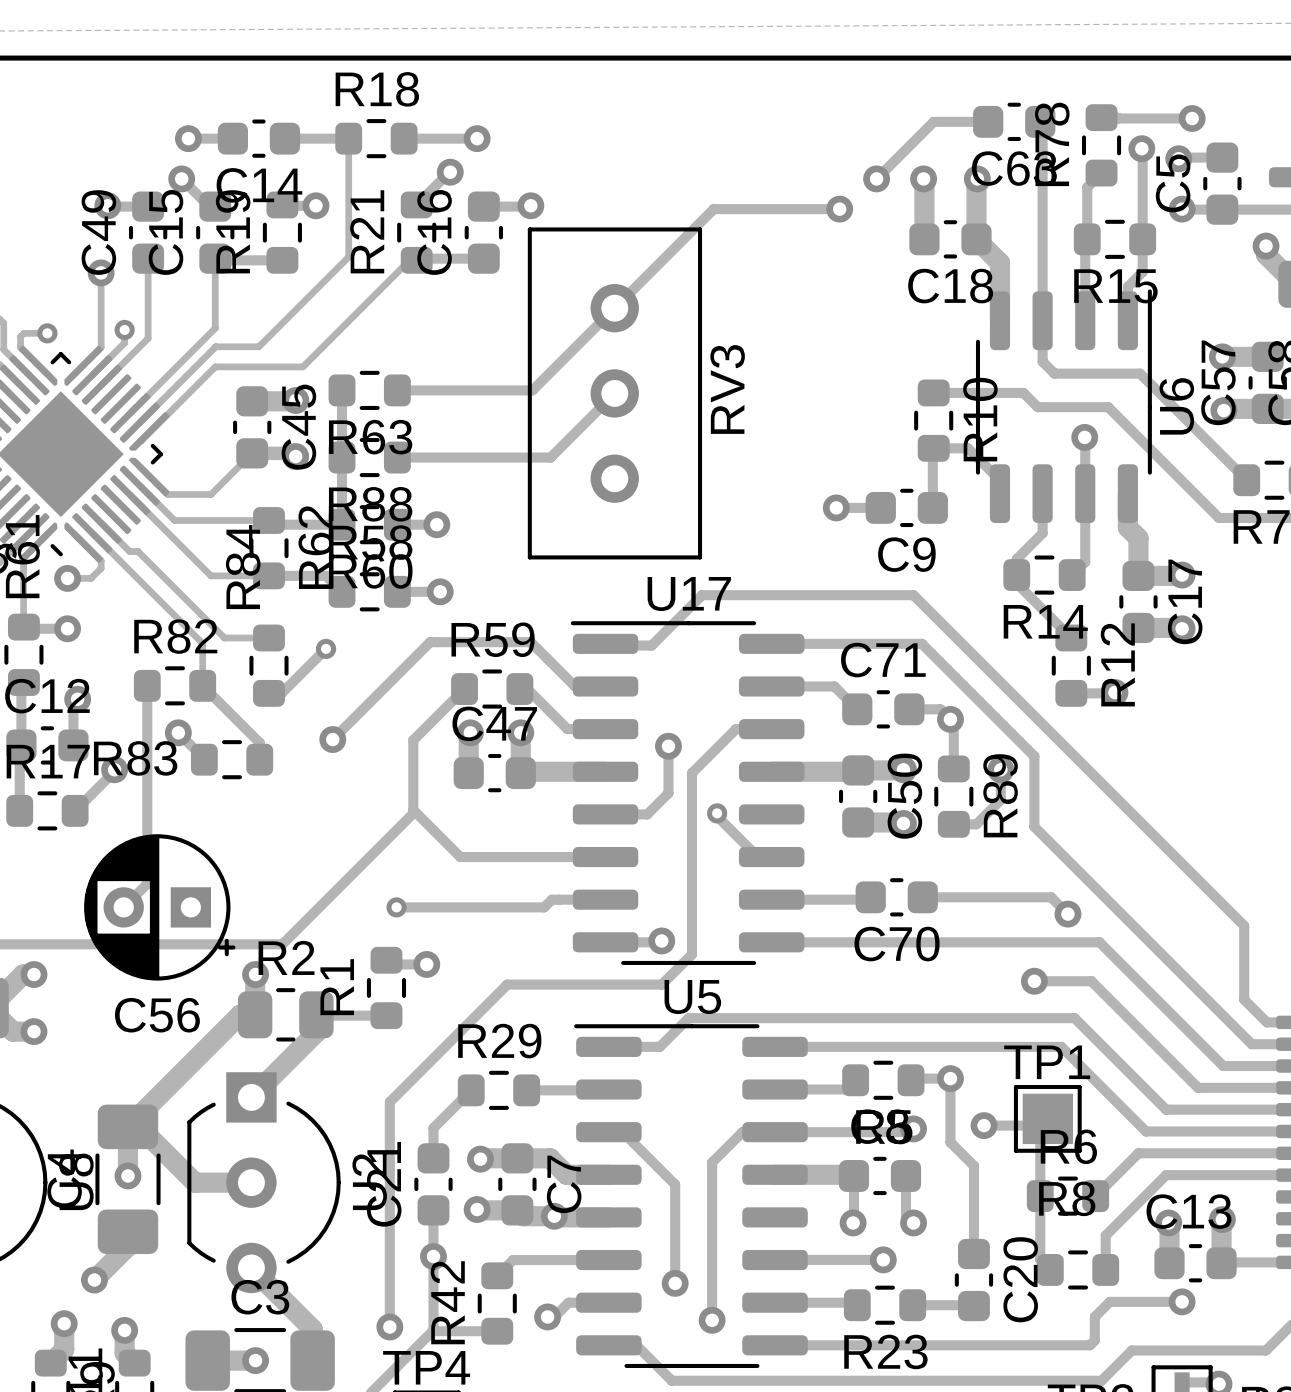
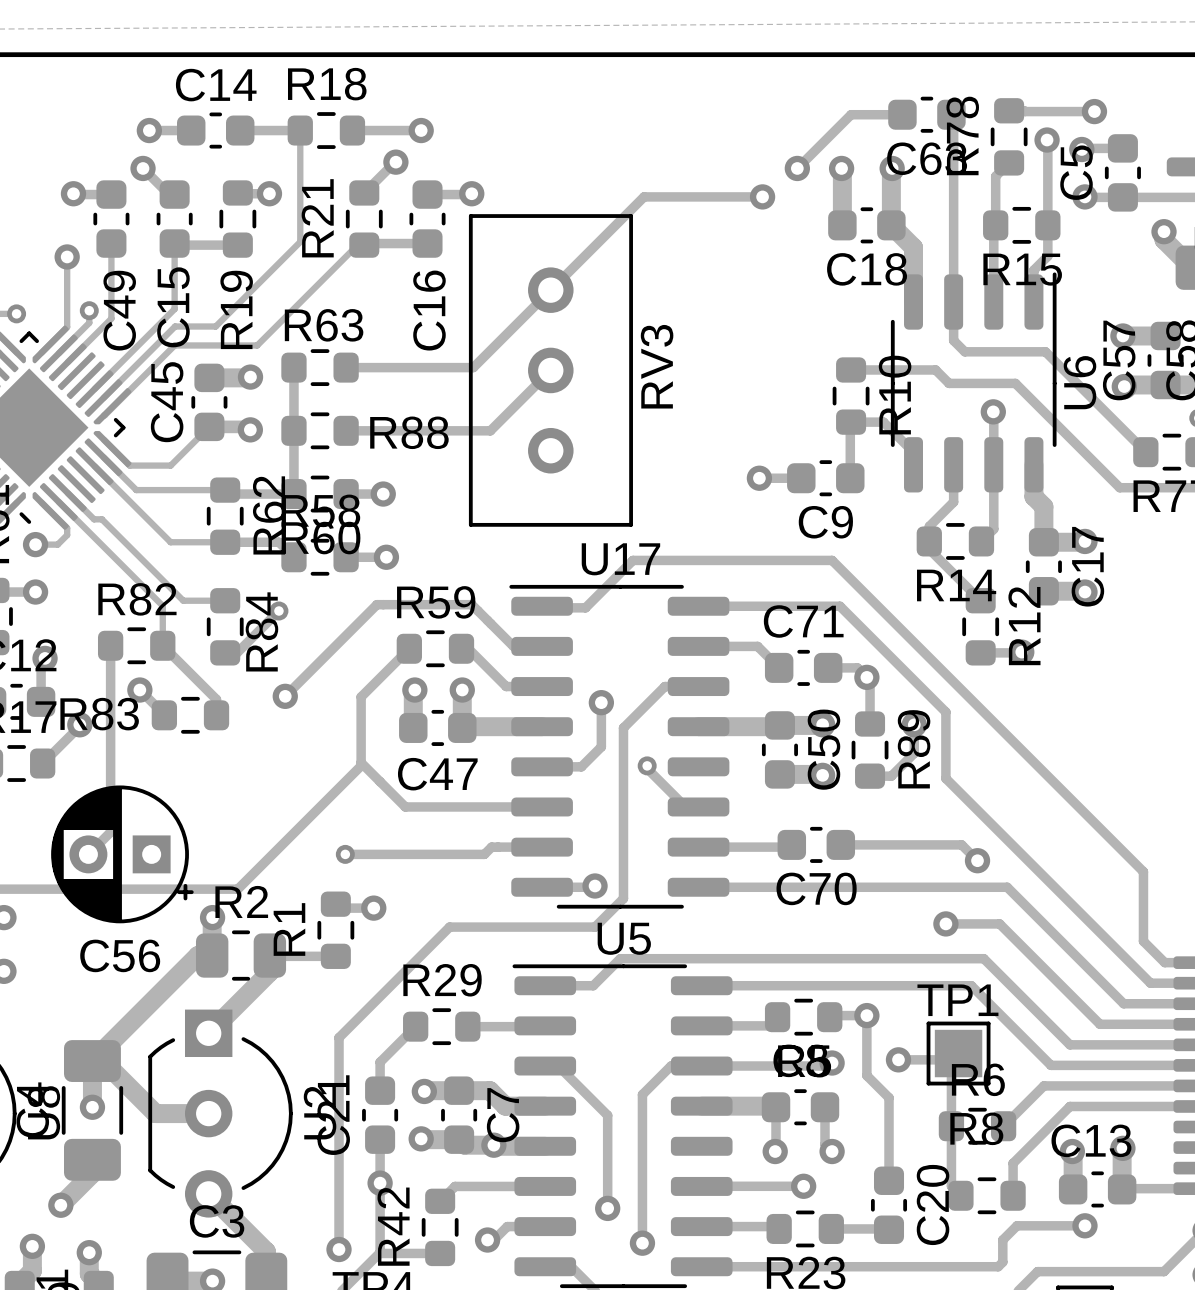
C14 name position: C14 (259, 185) -> C14 (216, 85)
R19 name position: R19 (233, 231) -> R19 (236, 309)
C49 name position: C49 (98, 232) -> C49 (119, 310)
C15 name position: C15 (166, 232) -> C15 (173, 307)
C16 name position: C16 (434, 232) -> C16 (429, 310)
C45 name position: C45 (298, 427) -> C45 (167, 402)
R63 name position: R63 (370, 437) -> R63 (324, 325)
R88 name position: R88 (370, 504) -> R88 (409, 432)
R84 name position: R84 (243, 567) -> R84 (261, 631)
C47 name position: C47 (494, 723) -> C47 (437, 774)

